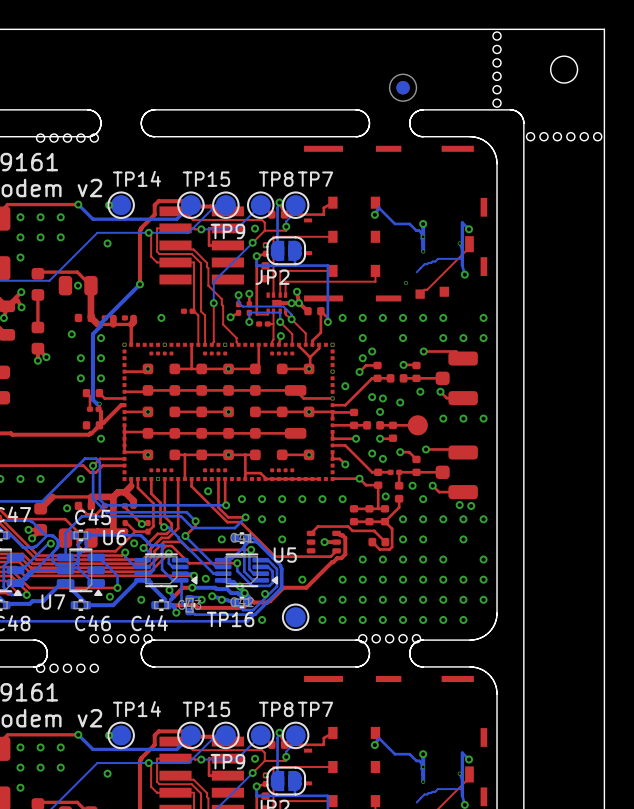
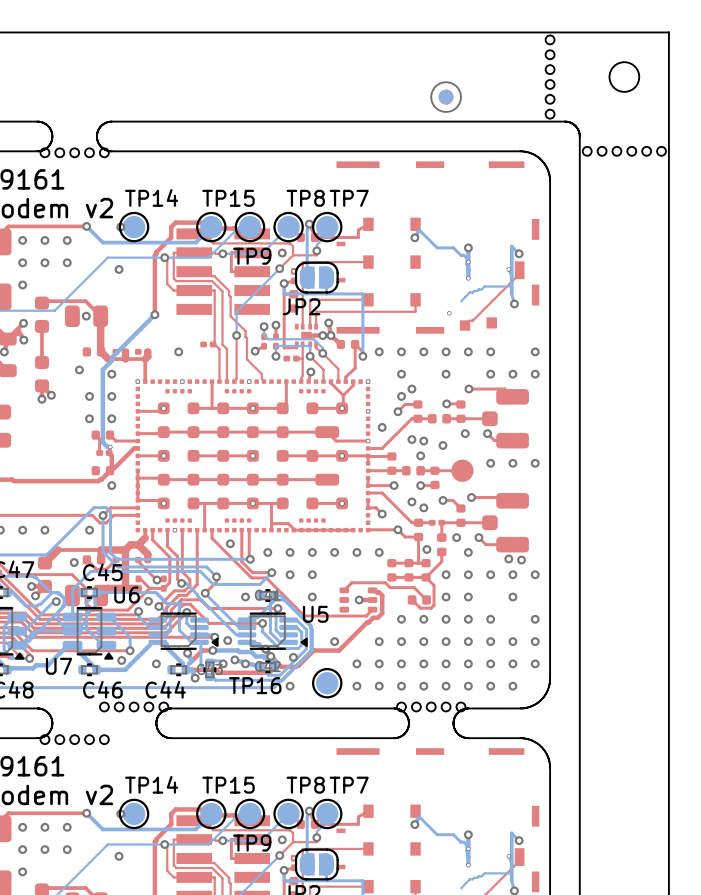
board edge: (33, 109) (90, 110) (97, 114) (101, 123) (97, 131) (90, 136) (33, 136) -> (37, 121) (48, 125) (52, 136) (48, 146) (37, 151)
board edge: (154, 109) (145, 113) (141, 123) (145, 132) (154, 136) -> (171, 121) (108, 121) (100, 127) (96, 136) (100, 145) (108, 151) (171, 151)
board edge: (356, 109) (365, 113) (369, 123) (365, 132) (356, 136) -> (468, 151) (394, 151)
board edge: (423, 109) (413, 113) (409, 123) (413, 132) (423, 136) -> (468, 121) (394, 121)

